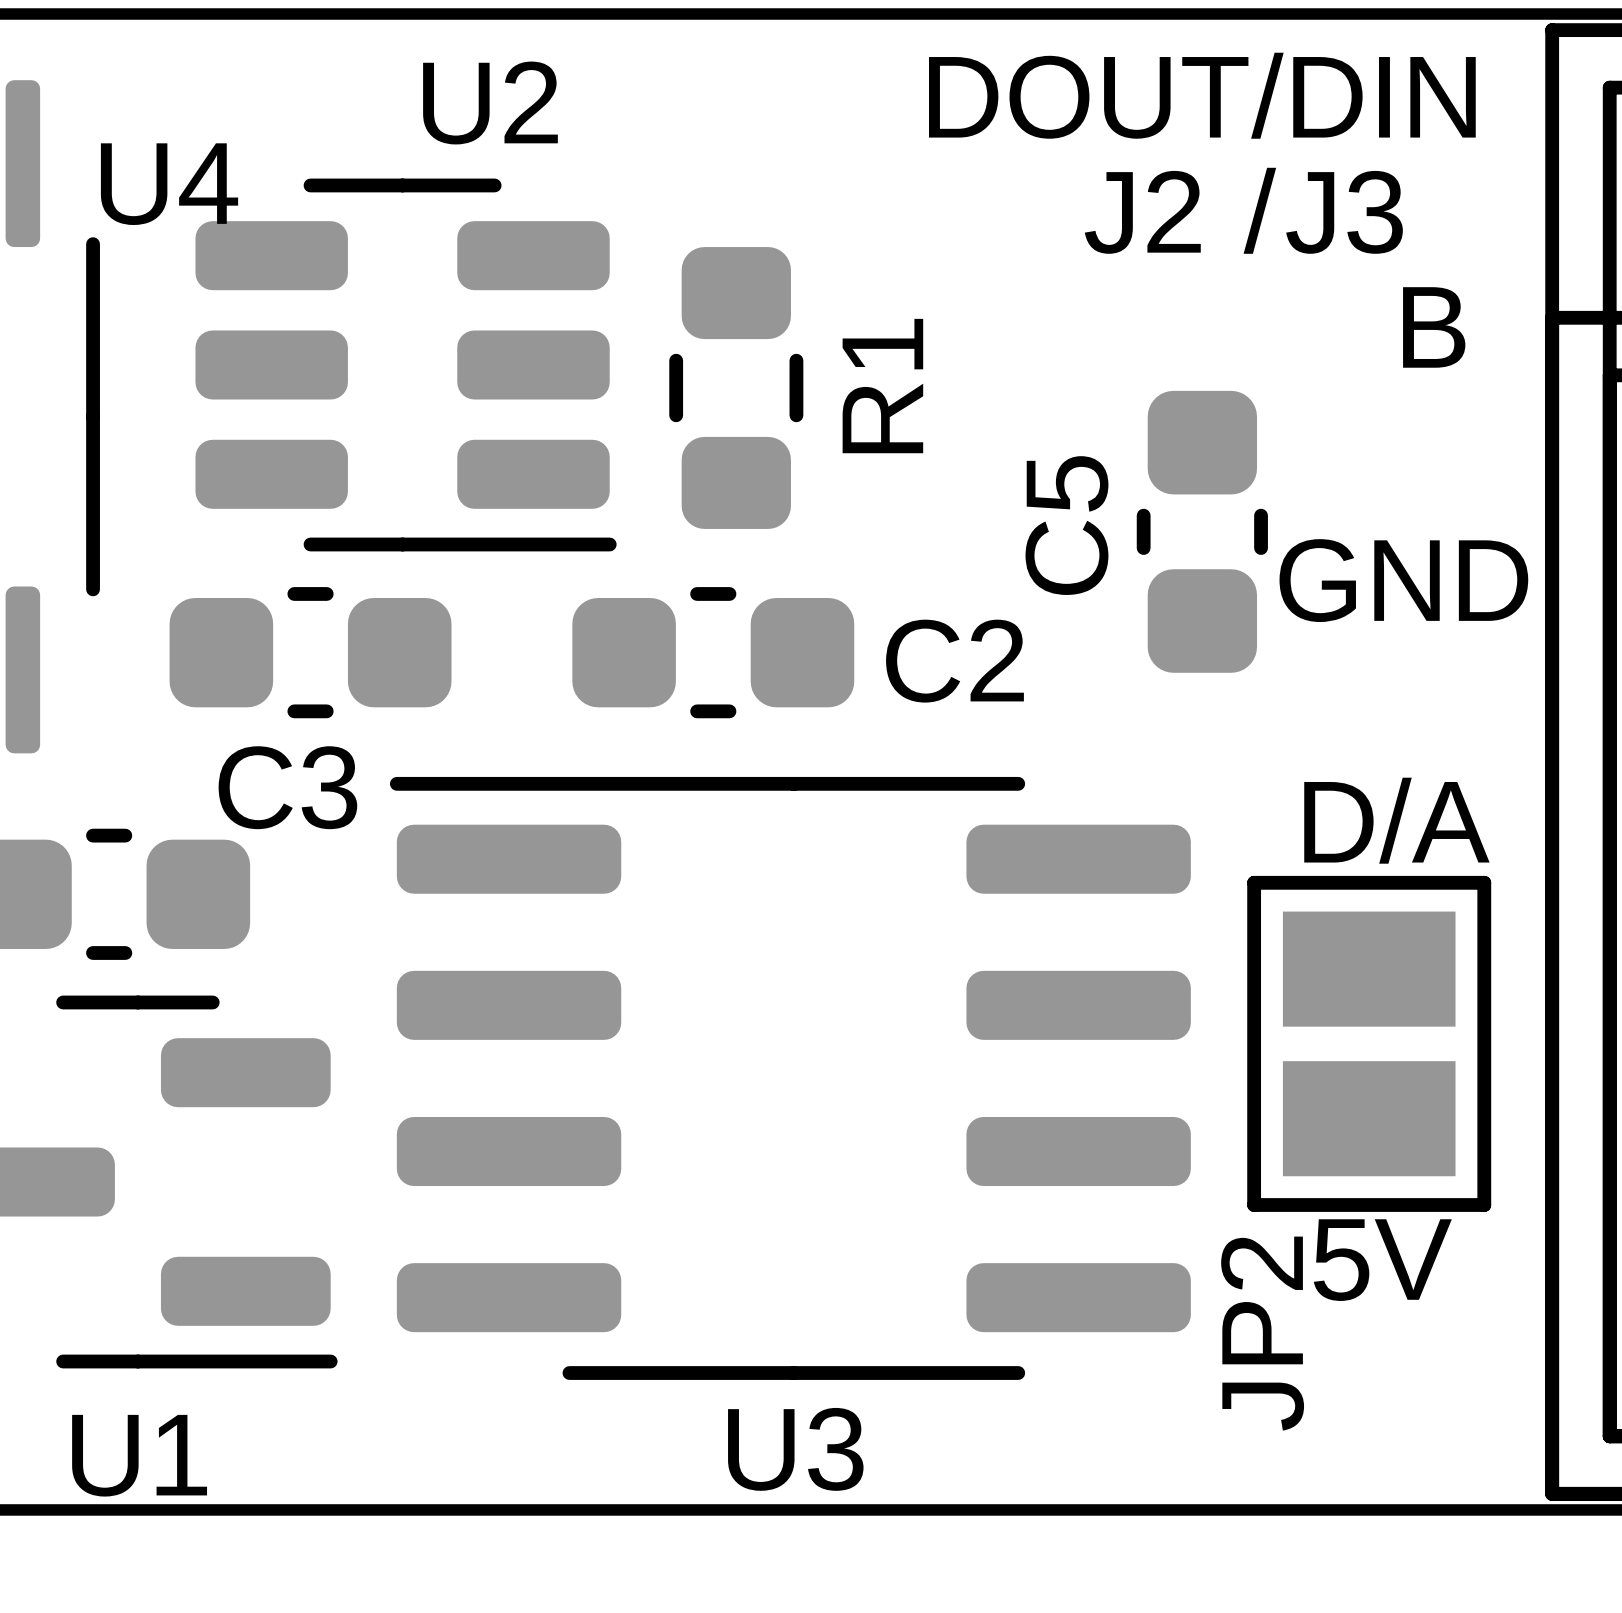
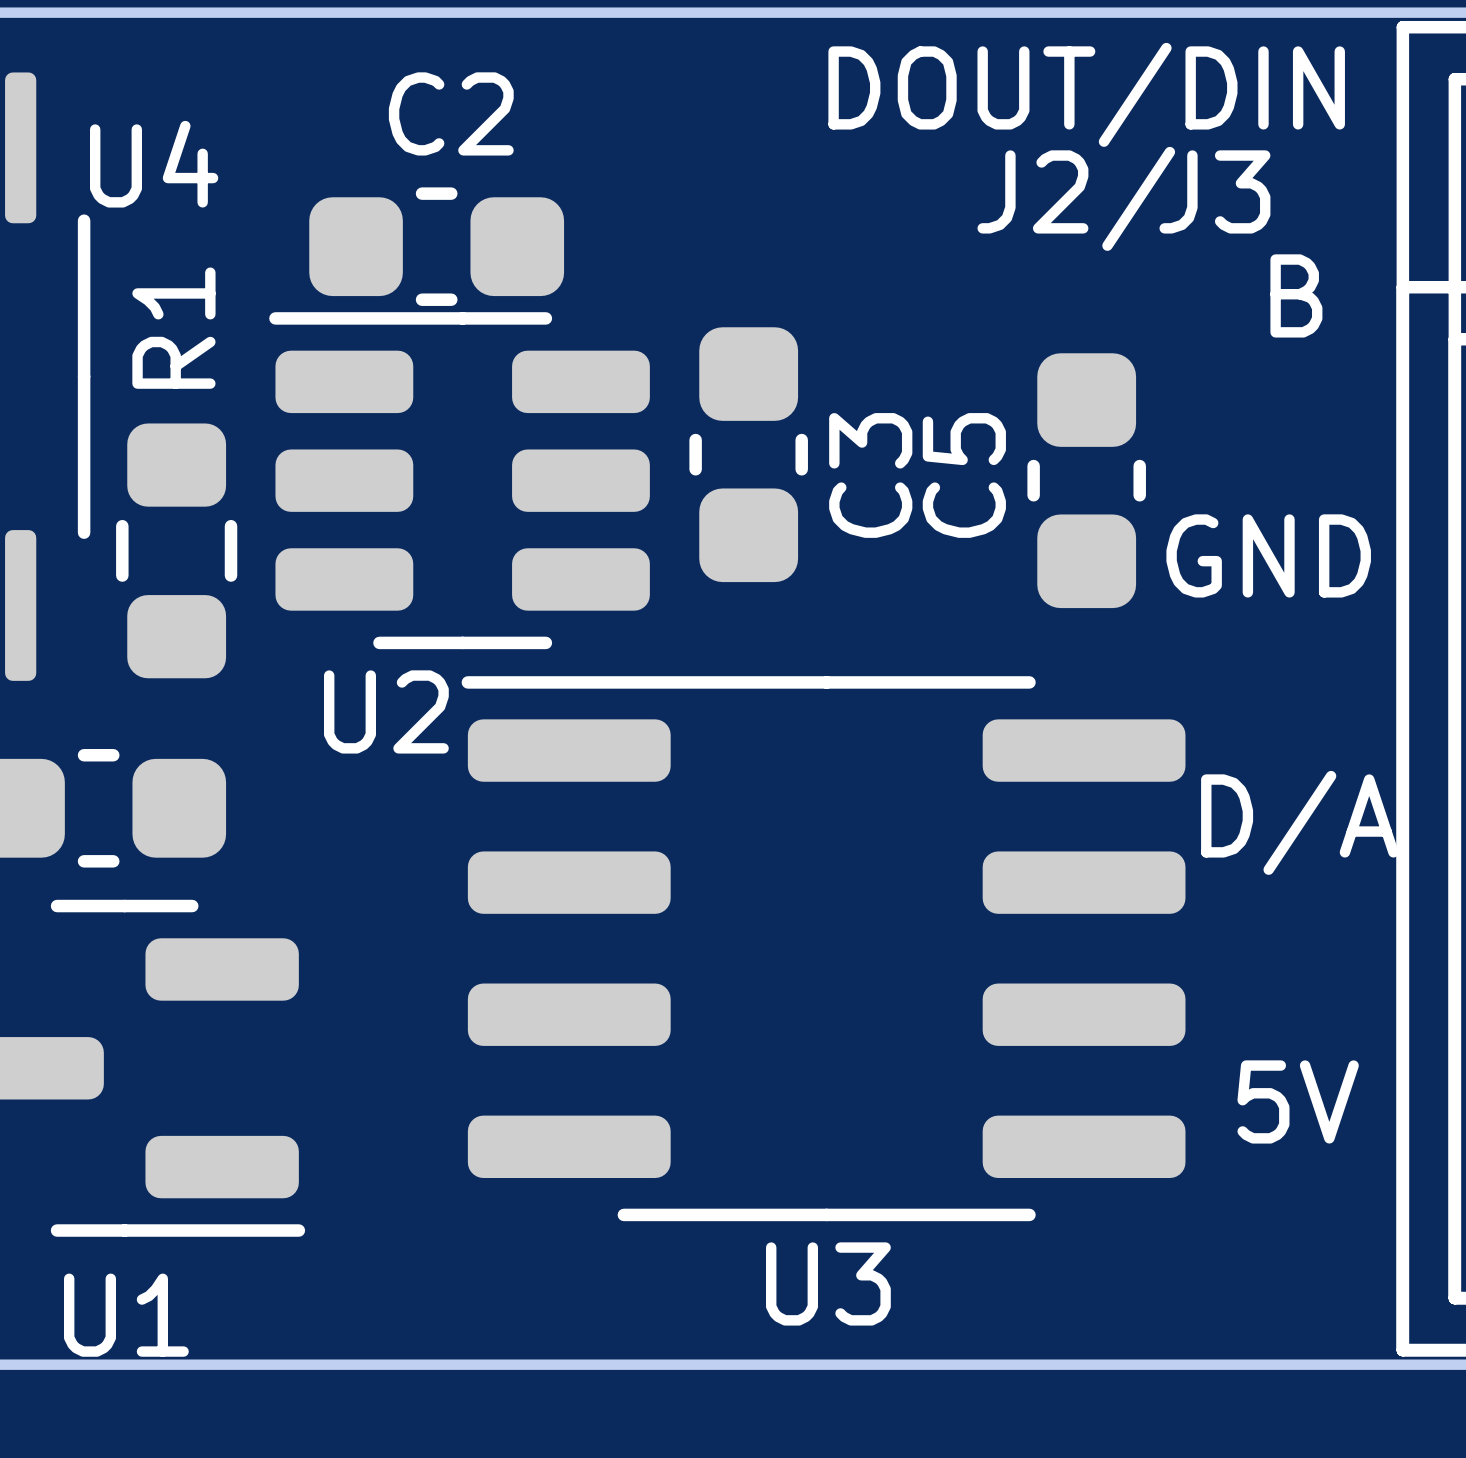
U2 rotation: 0° (406, 364) -> 180° (459, 480)
R1 name position: R1 (882, 386) -> R1 (173, 328)
R1 position: (736, 387) -> (176, 550)
text position: GND (1403, 580) -> GND (1268, 555)
C3 rotation: 0° (310, 652) -> 90° clockwise (748, 454)
C3 position: (310, 652) -> (748, 454)
C2 position: (713, 652) -> (436, 246)
C2 name position: C2 (954, 661) -> C2 (451, 113)
text position: D/A (1396, 820) -> D/A (1299, 822)
JP2: (1369, 1043) -> none
U3 position: (790, 1078) -> (823, 948)
text position: 5V (1382, 1260) -> 5V (1298, 1101)

